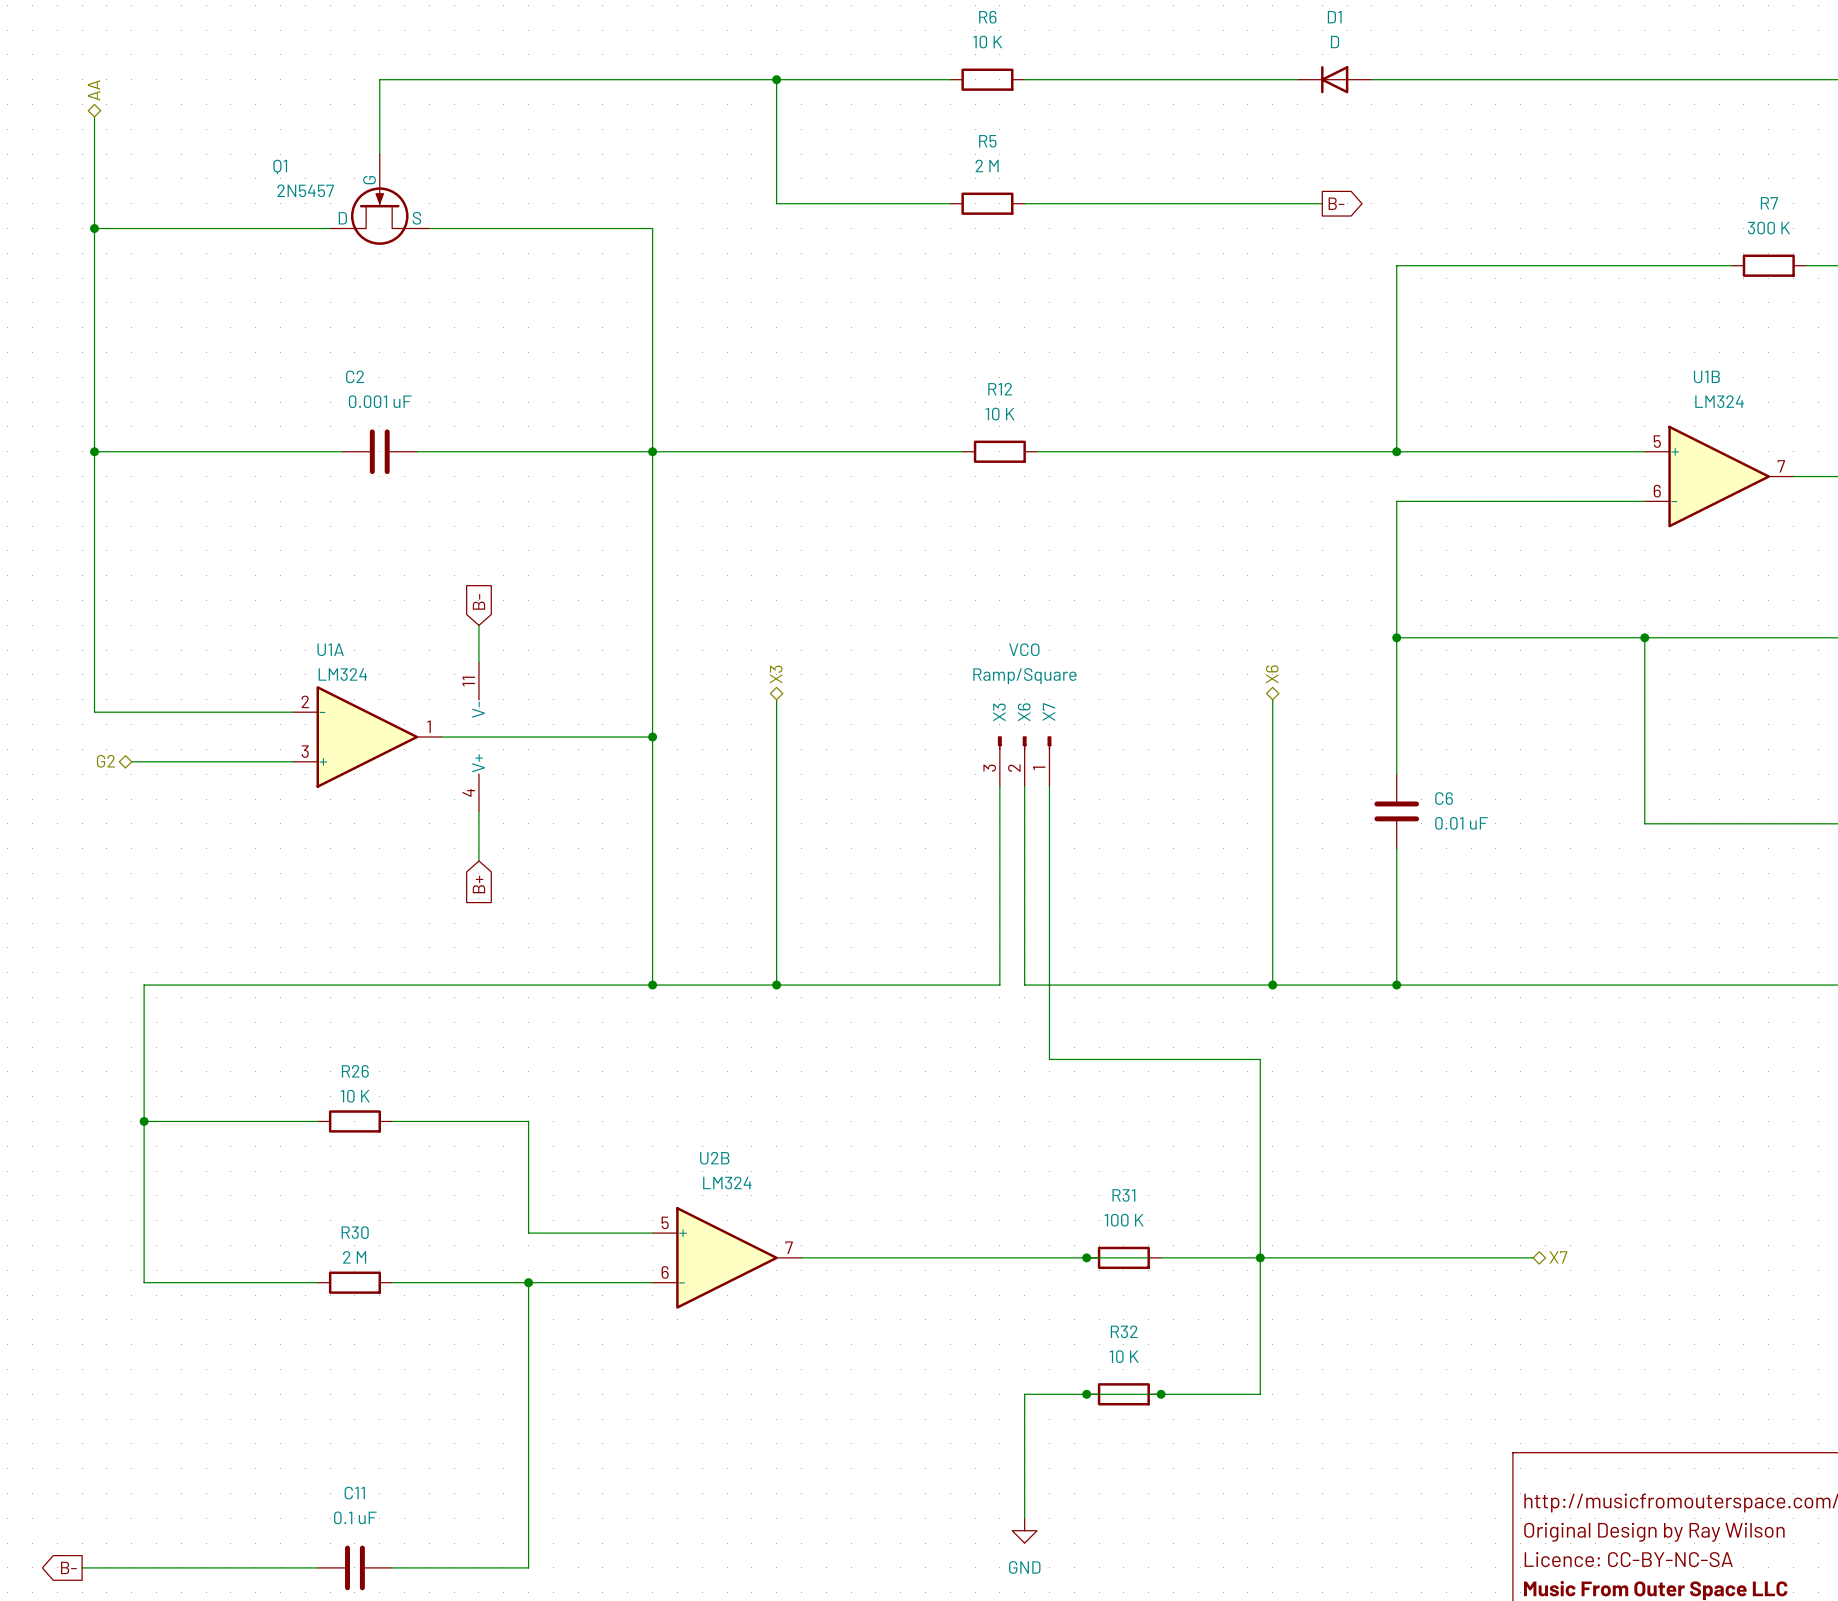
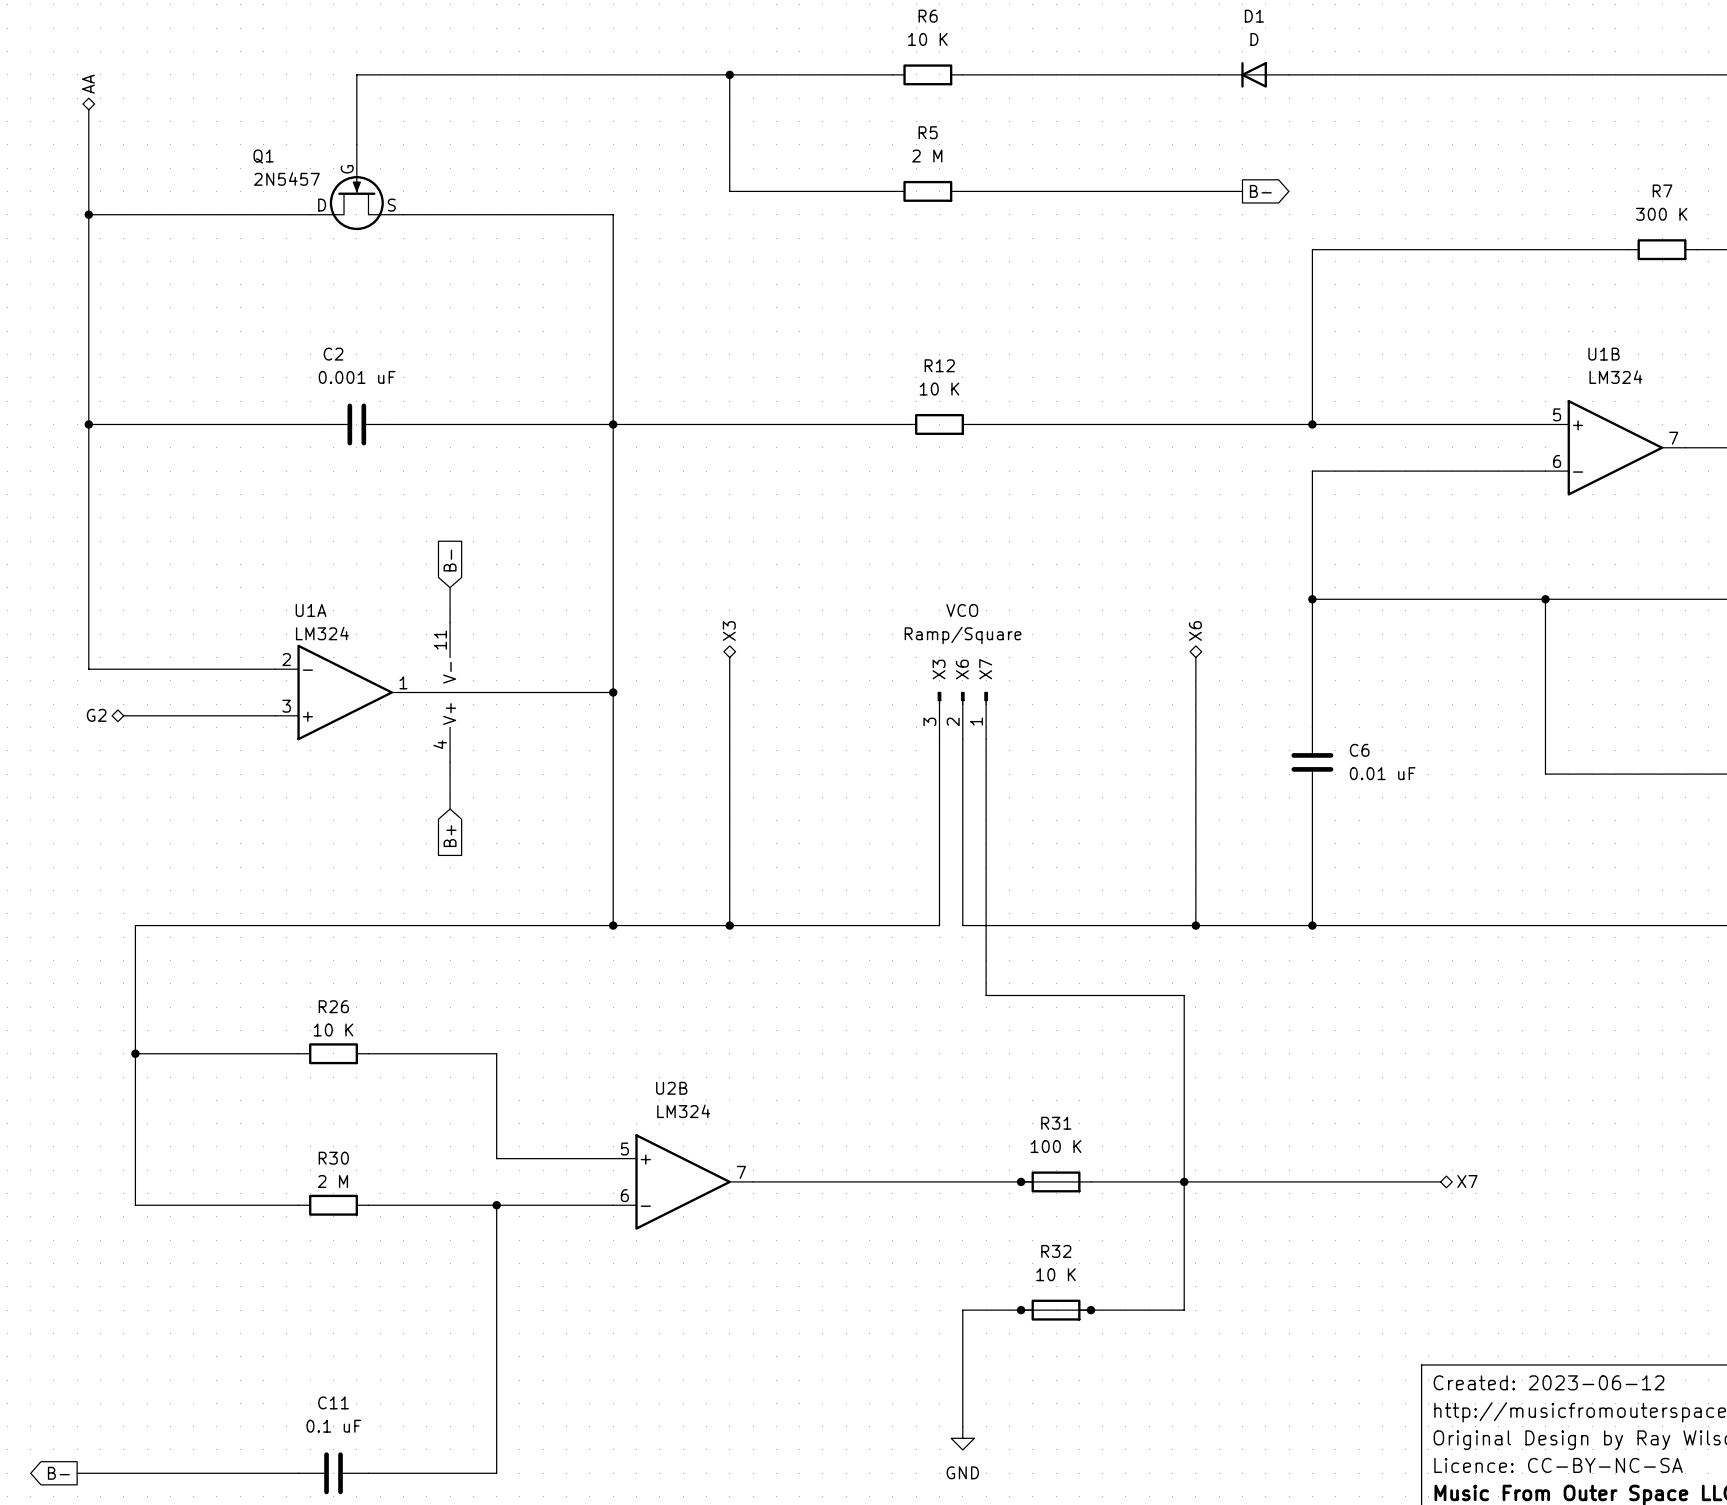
title block: none -> Created: 2023-06-12 (1549, 1382)

